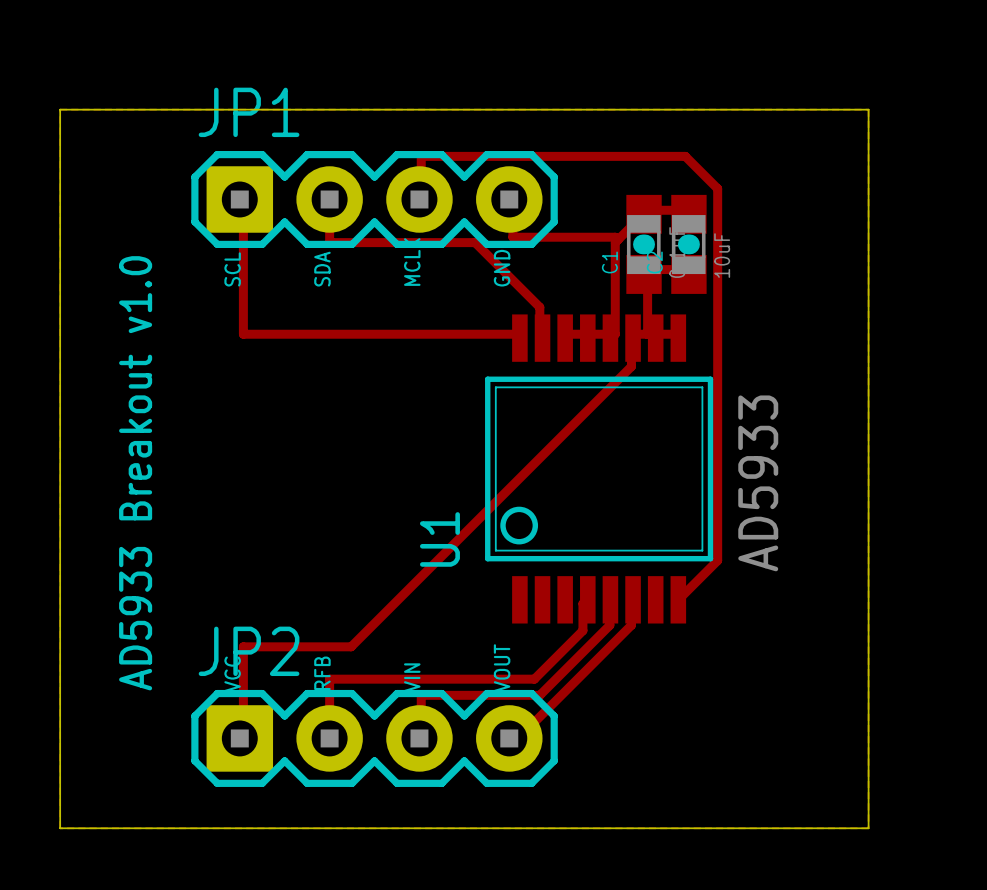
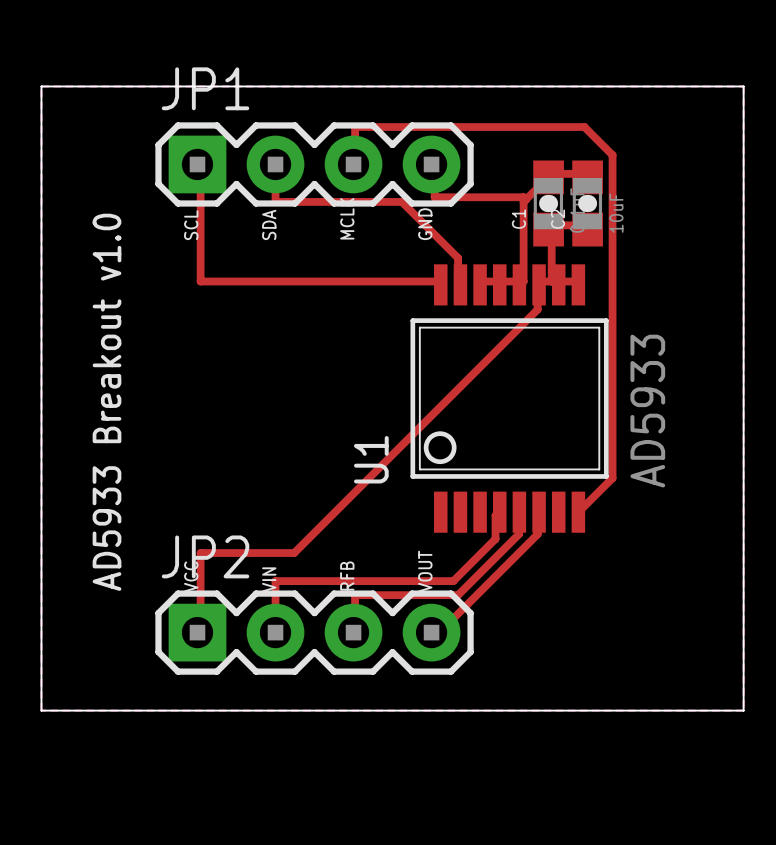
text: RFB (322, 673) -> VIN (269, 579)
text: VIN (412, 677) -> RFB (347, 576)

